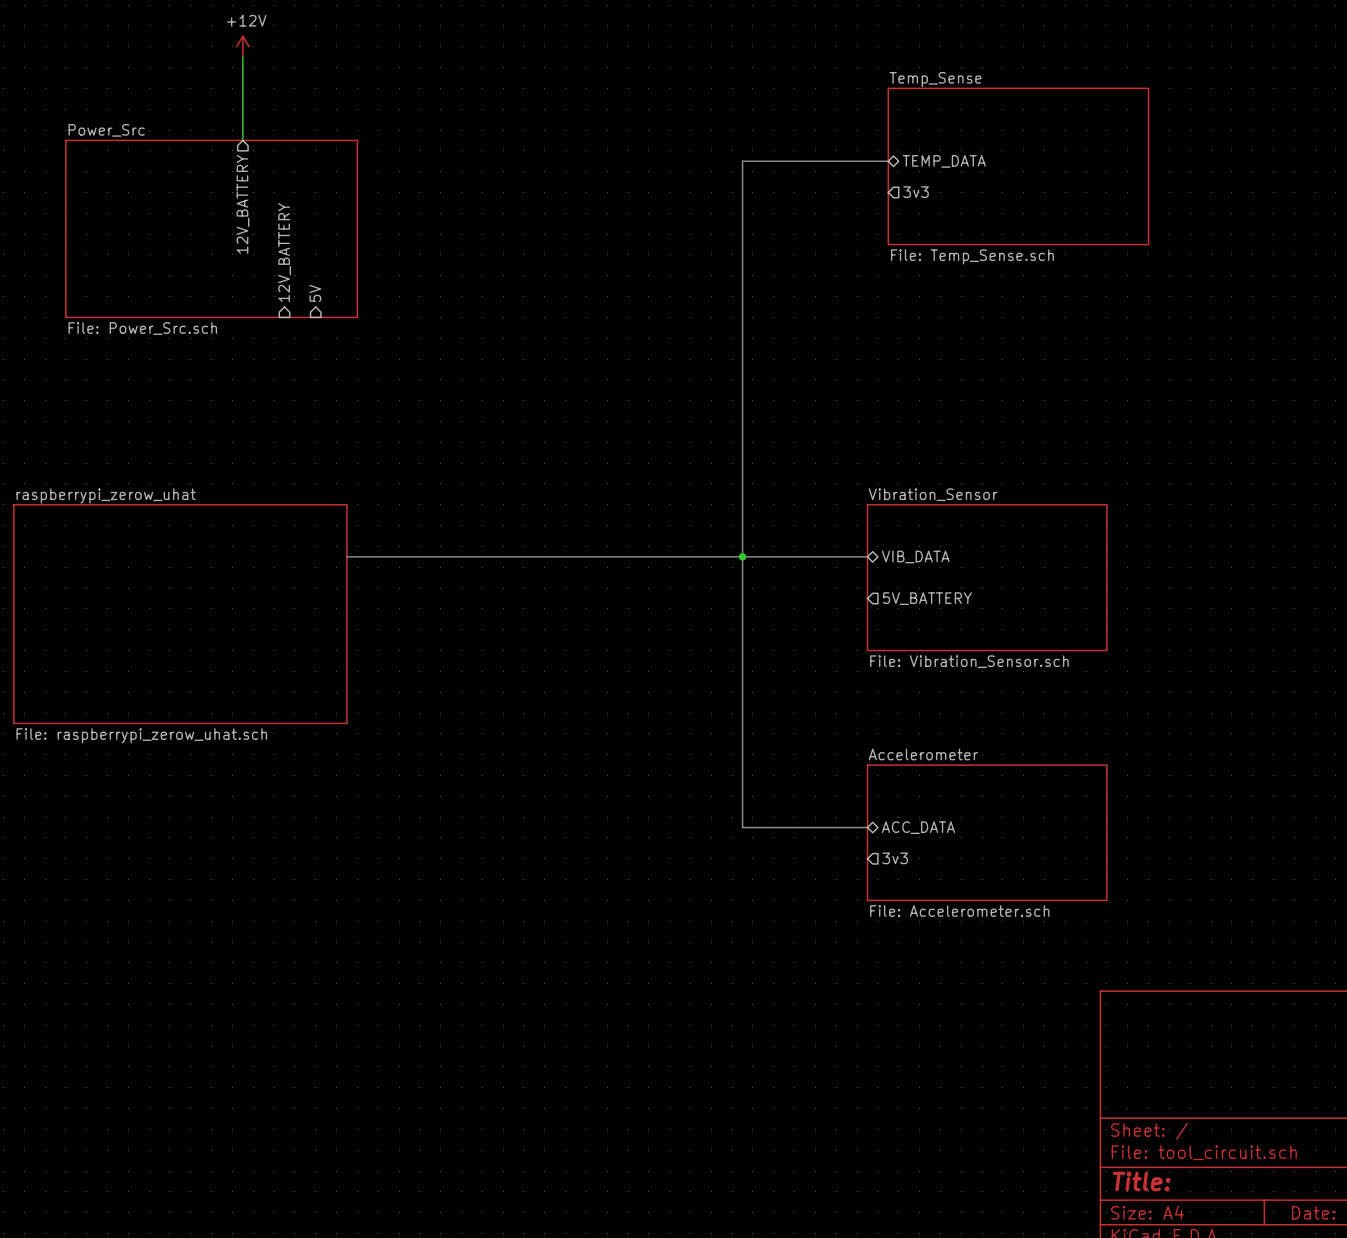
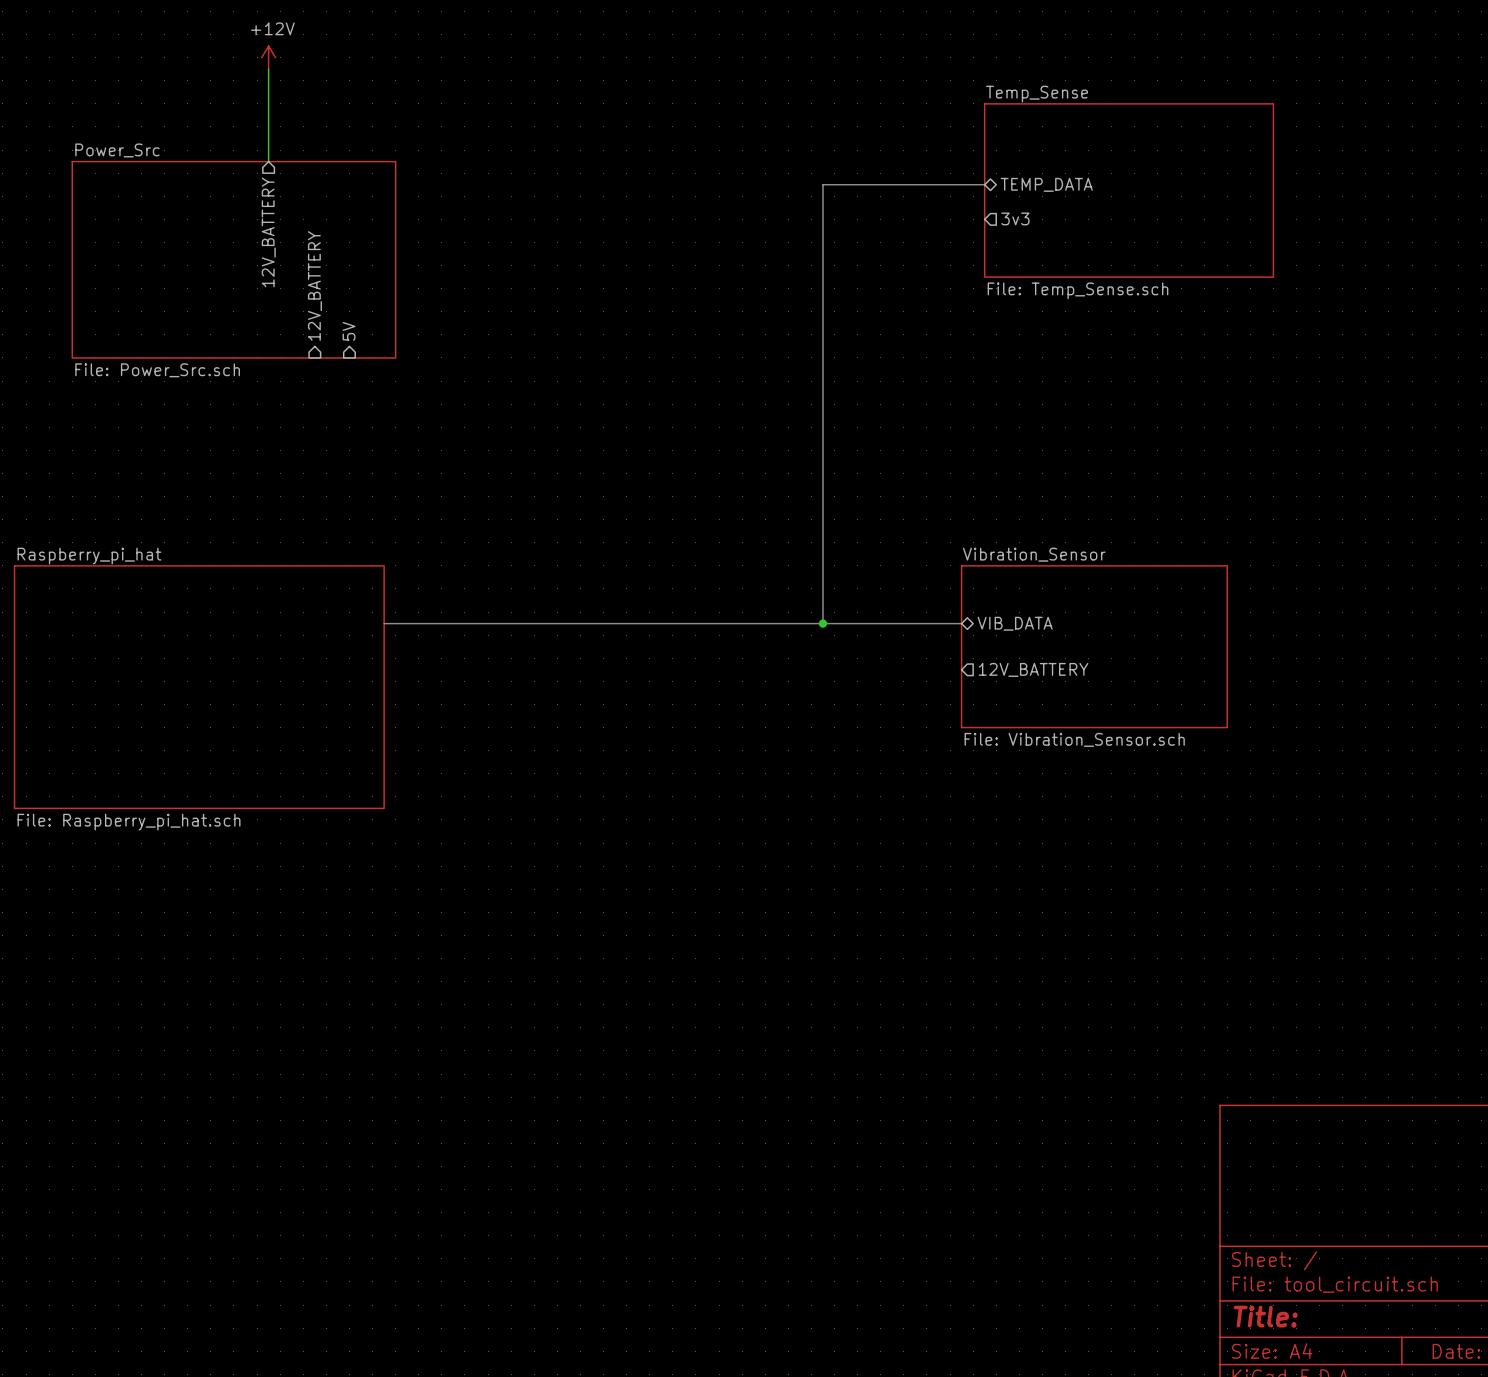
sheet raspberrypi_zerow_uhat name: raspberrypi_zerow_uhat (106, 495) -> Raspberry_pi_hat (89, 556)
bus: (742, 556) (742, 827) (867, 827) -> none
hierarchical label: 5V_BATTERY (927, 598) -> 12V_BATTERY (1033, 669)
sheet raspberrypi_zerow_uhat value: File: raspberrypi_zerow_uhat.sch (141, 735) -> File: Raspberry_pi_hat.sch (129, 822)
hierarchical label: ACC_DATA (918, 827) -> none
sheet Accelerometer: File: Accelerometer.sch (987, 832) -> none
hierarchical label: 3v3 (895, 858) -> none

